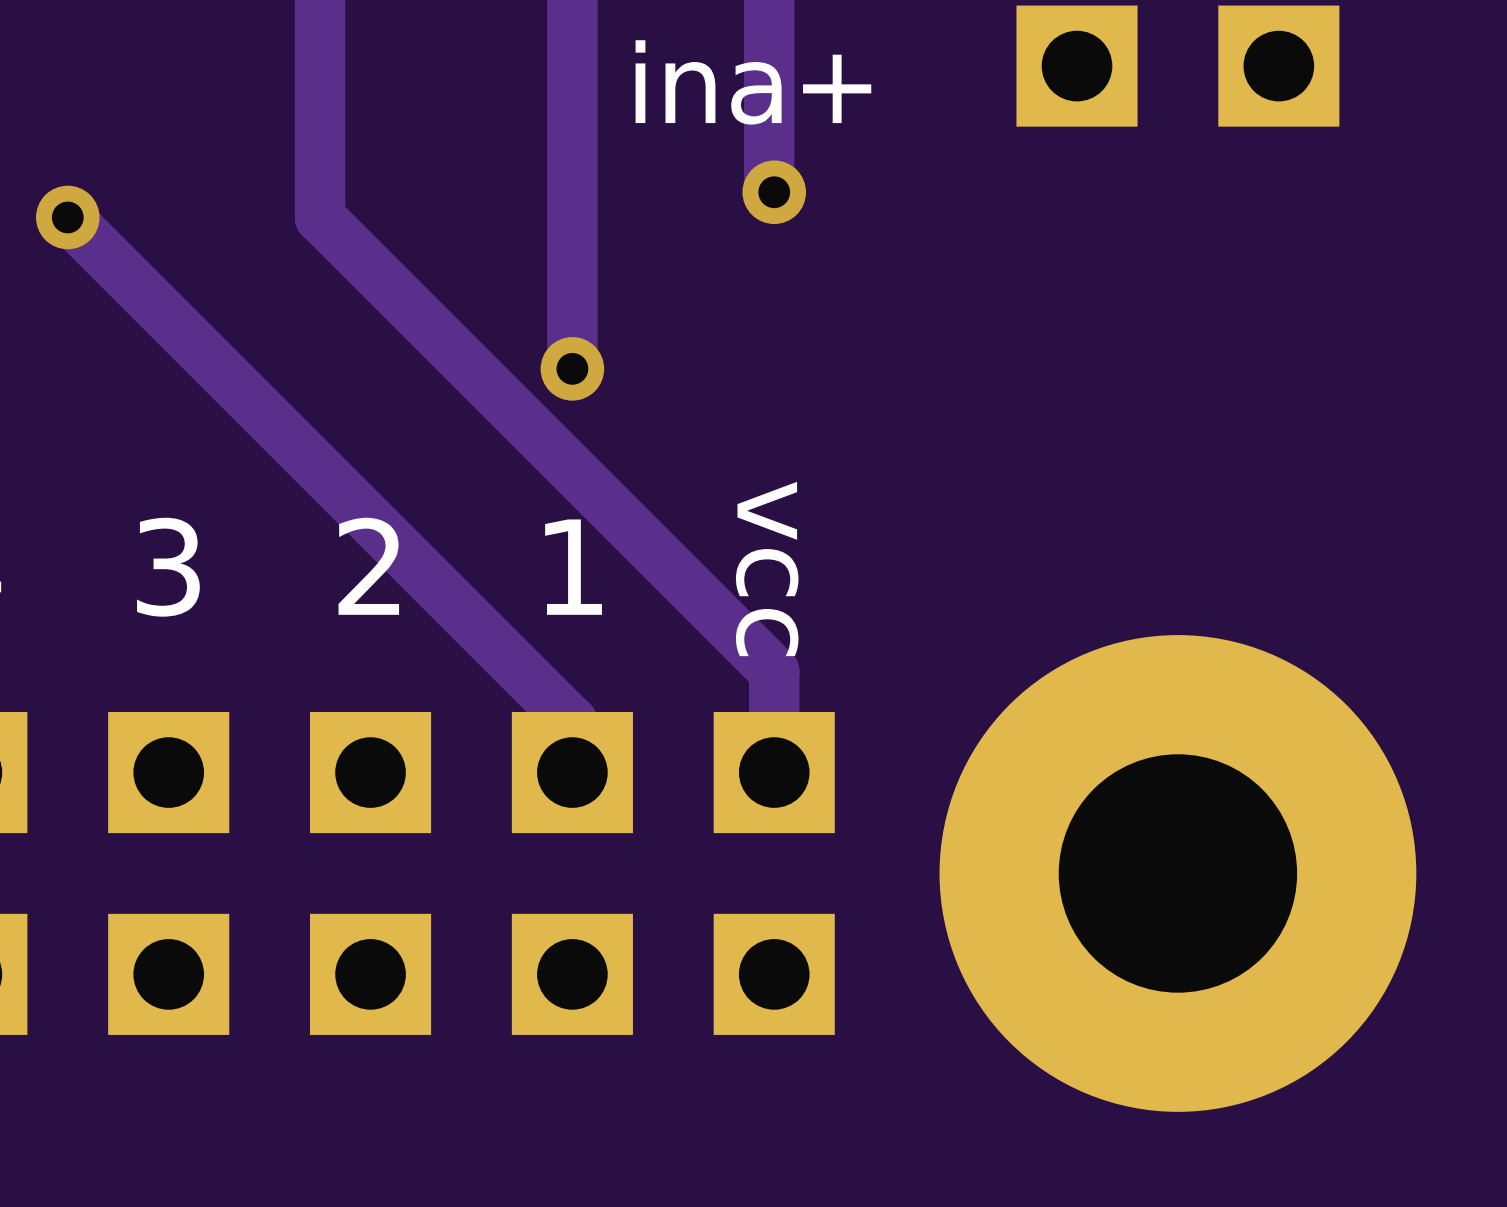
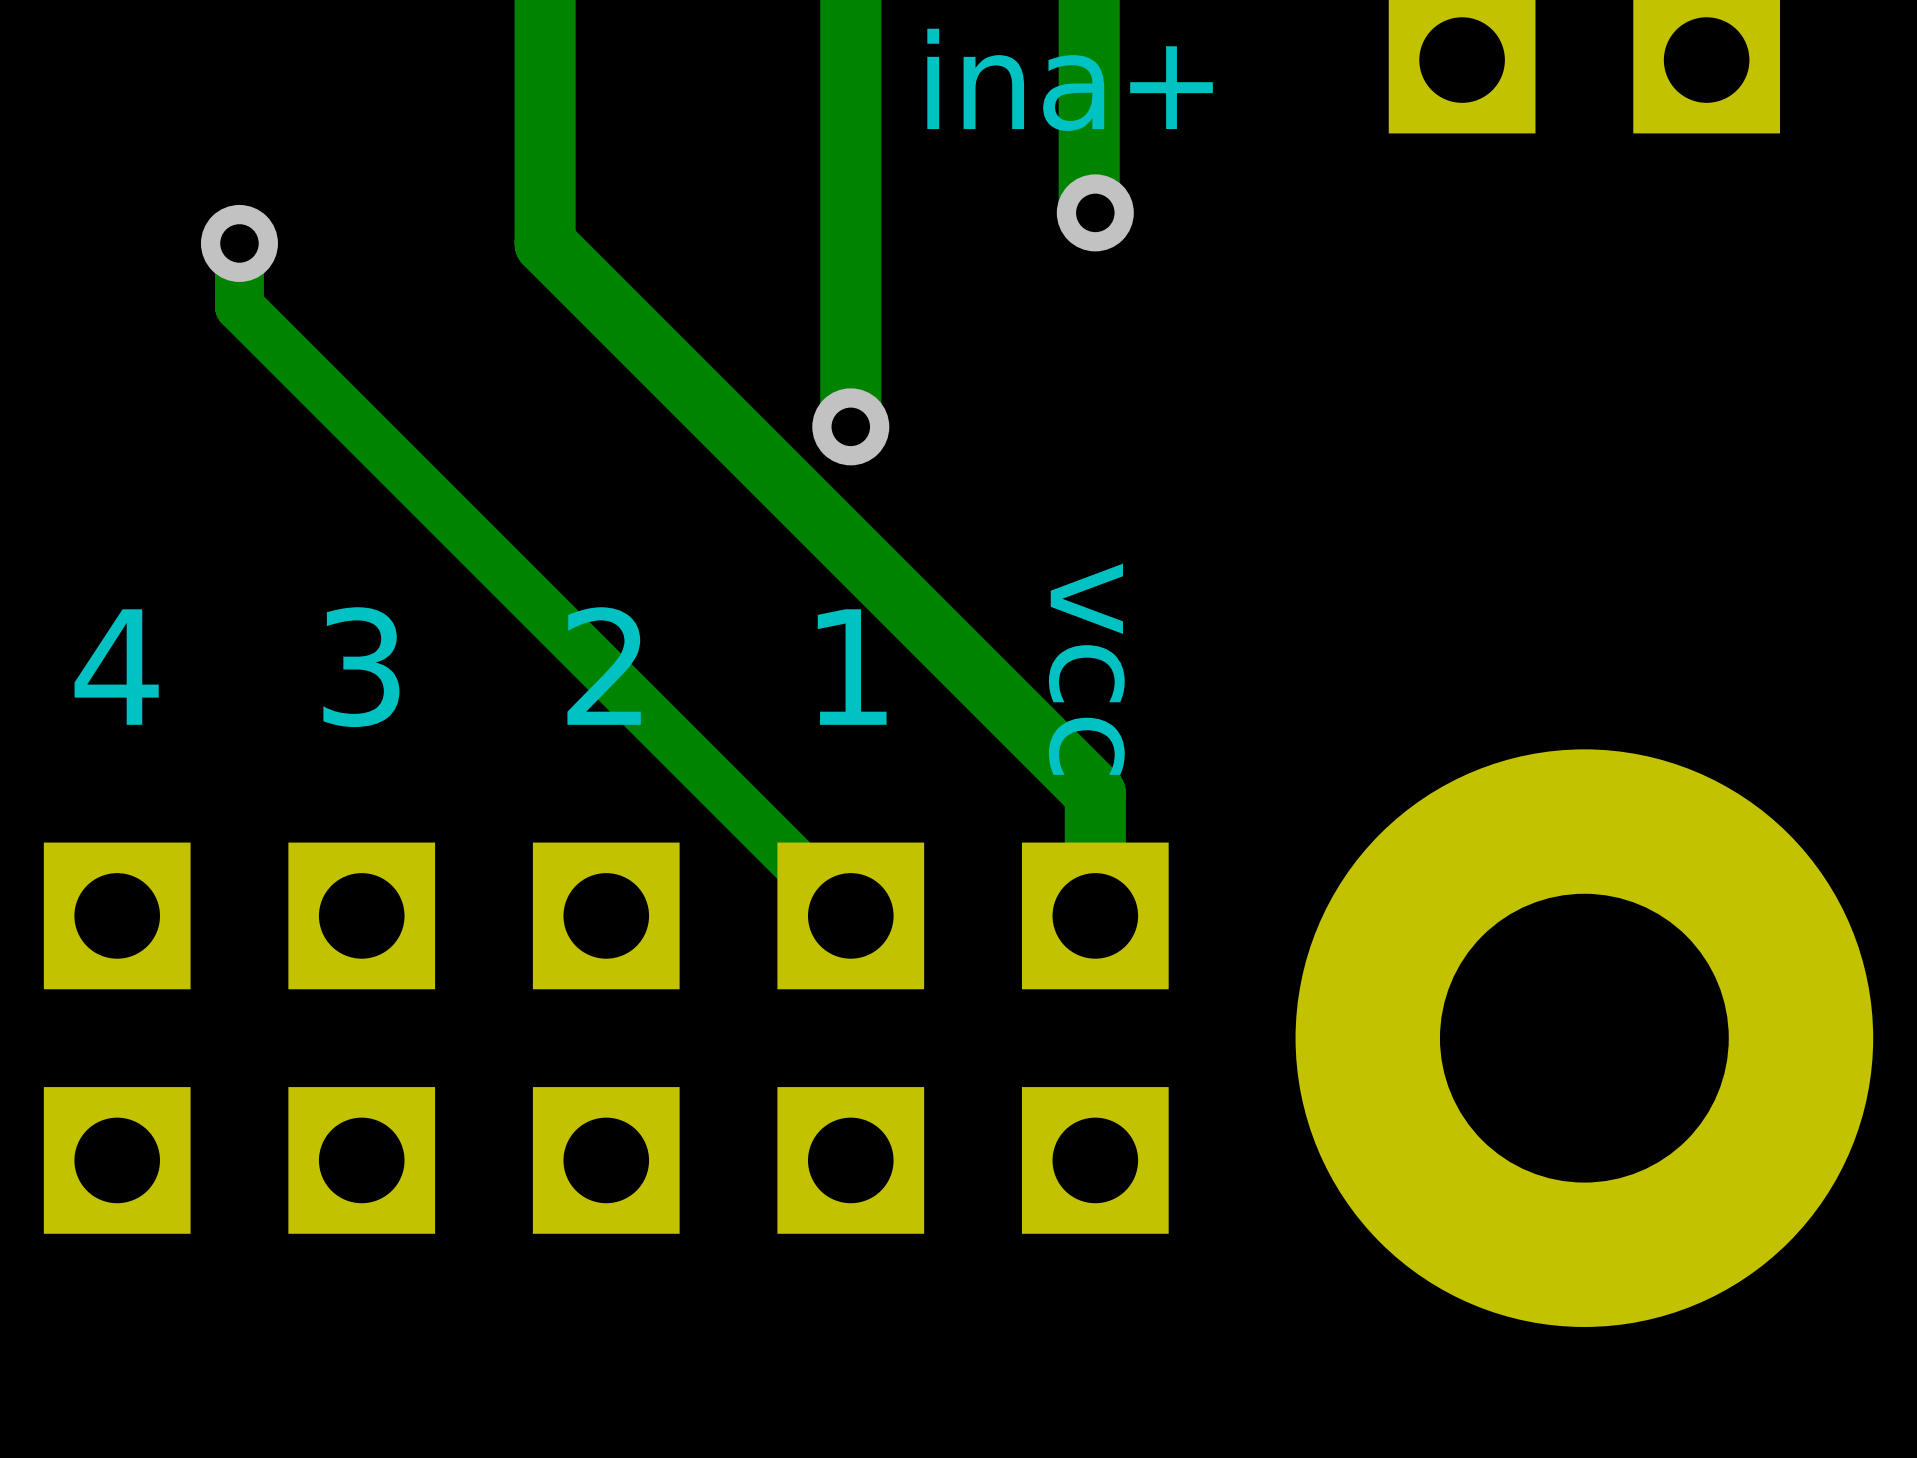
track: (67, 217) (572, 722) (572, 772) -> (239, 243) (239, 306) (848, 915)

